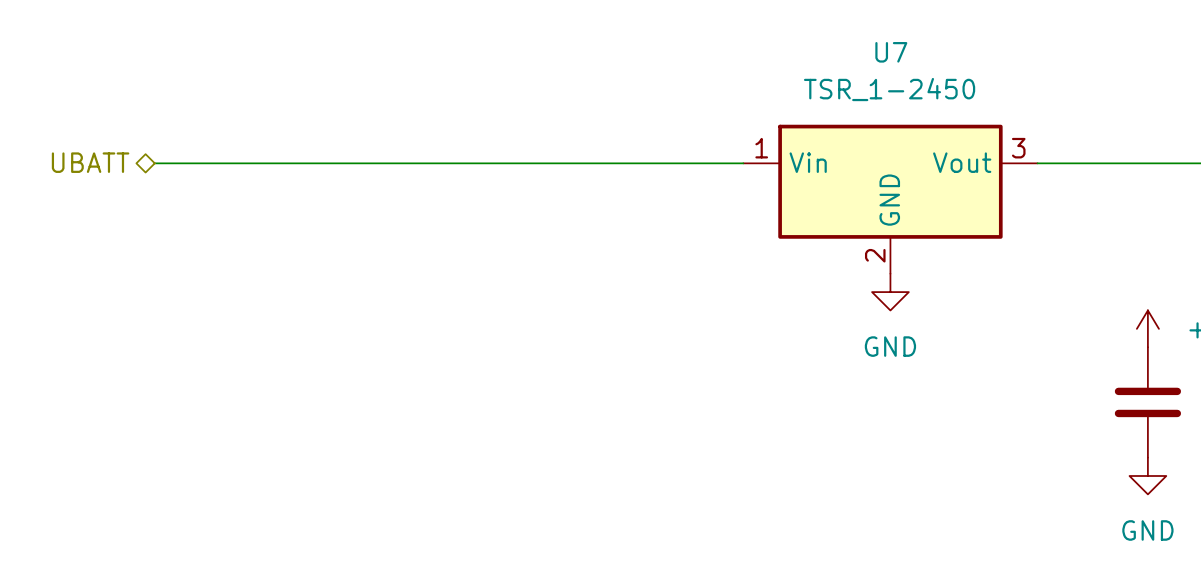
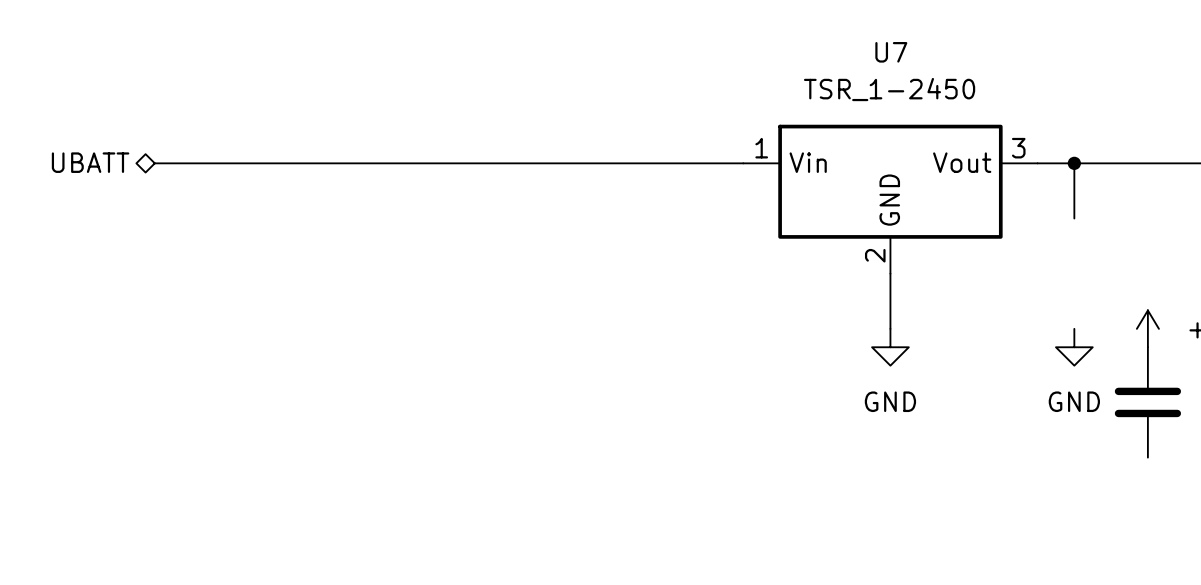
wire: none -> (1074, 163) (1074, 218)
junction: none -> (1074, 163)
wire: none -> (890, 273) (890, 328)
power symbol position: GND (890, 292) -> GND (890, 347)
power symbol: none -> GND (1074, 347)
power symbol: GND (1147, 476) -> none

